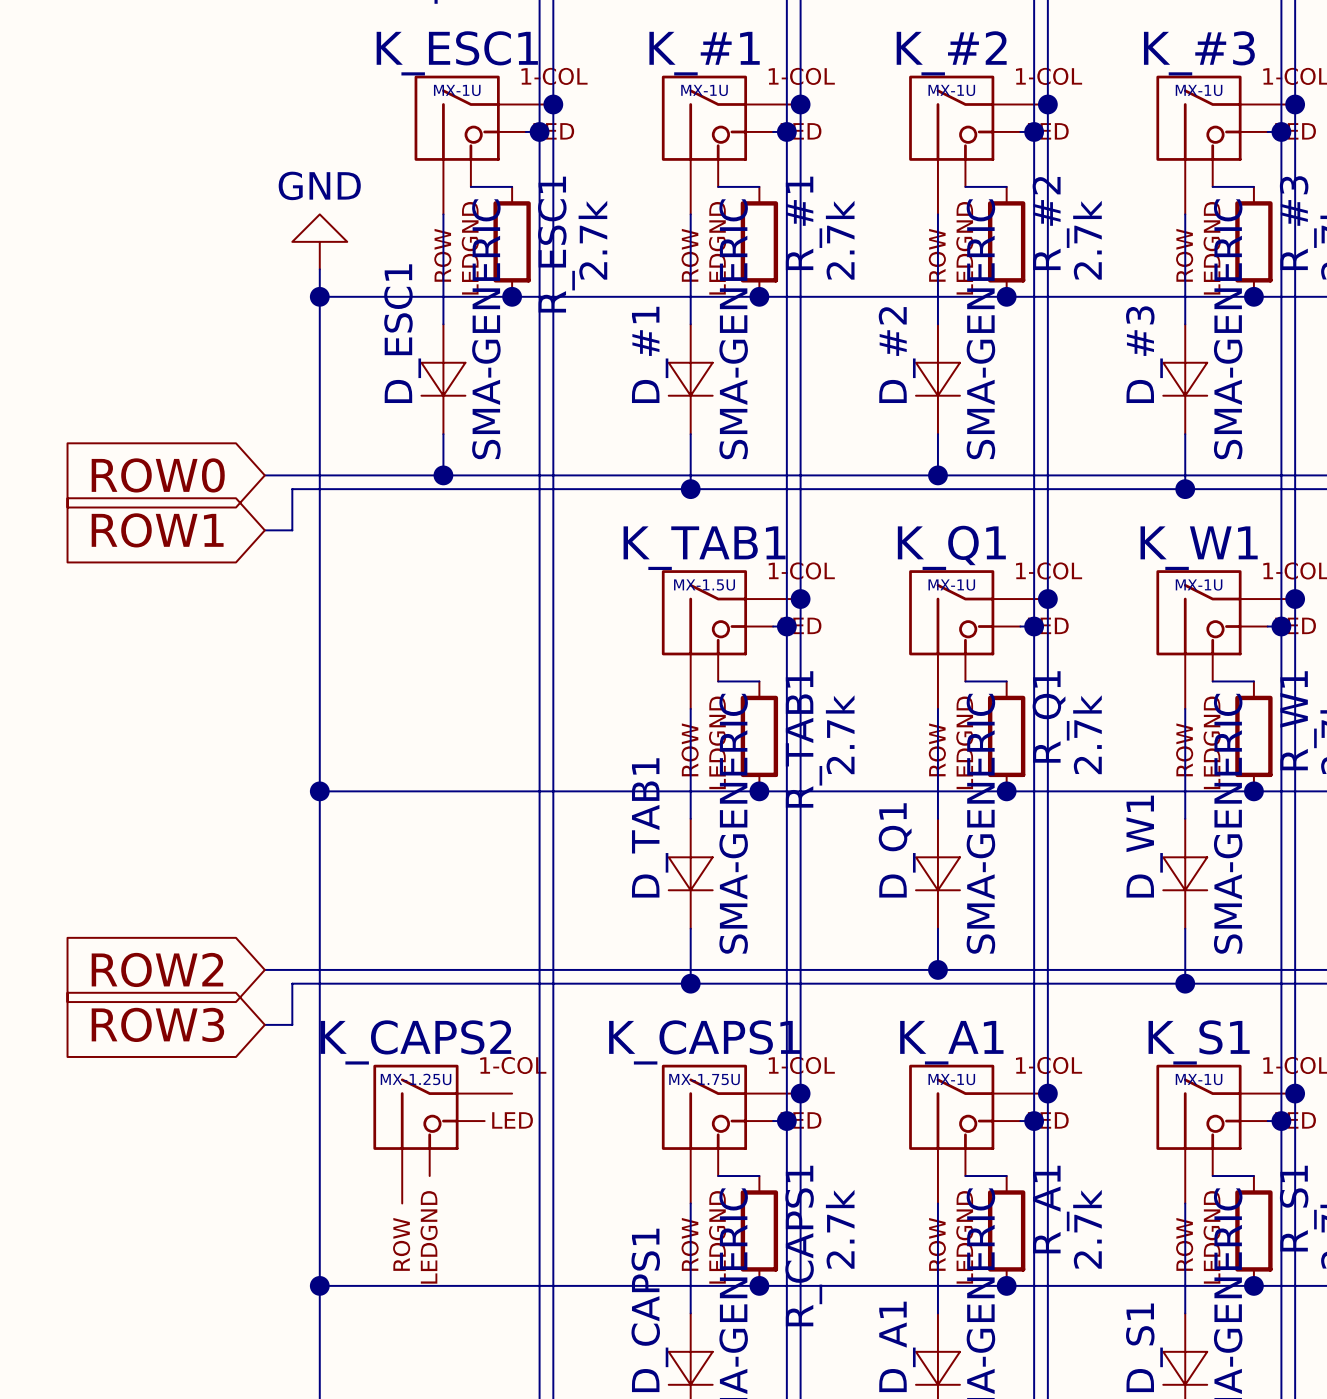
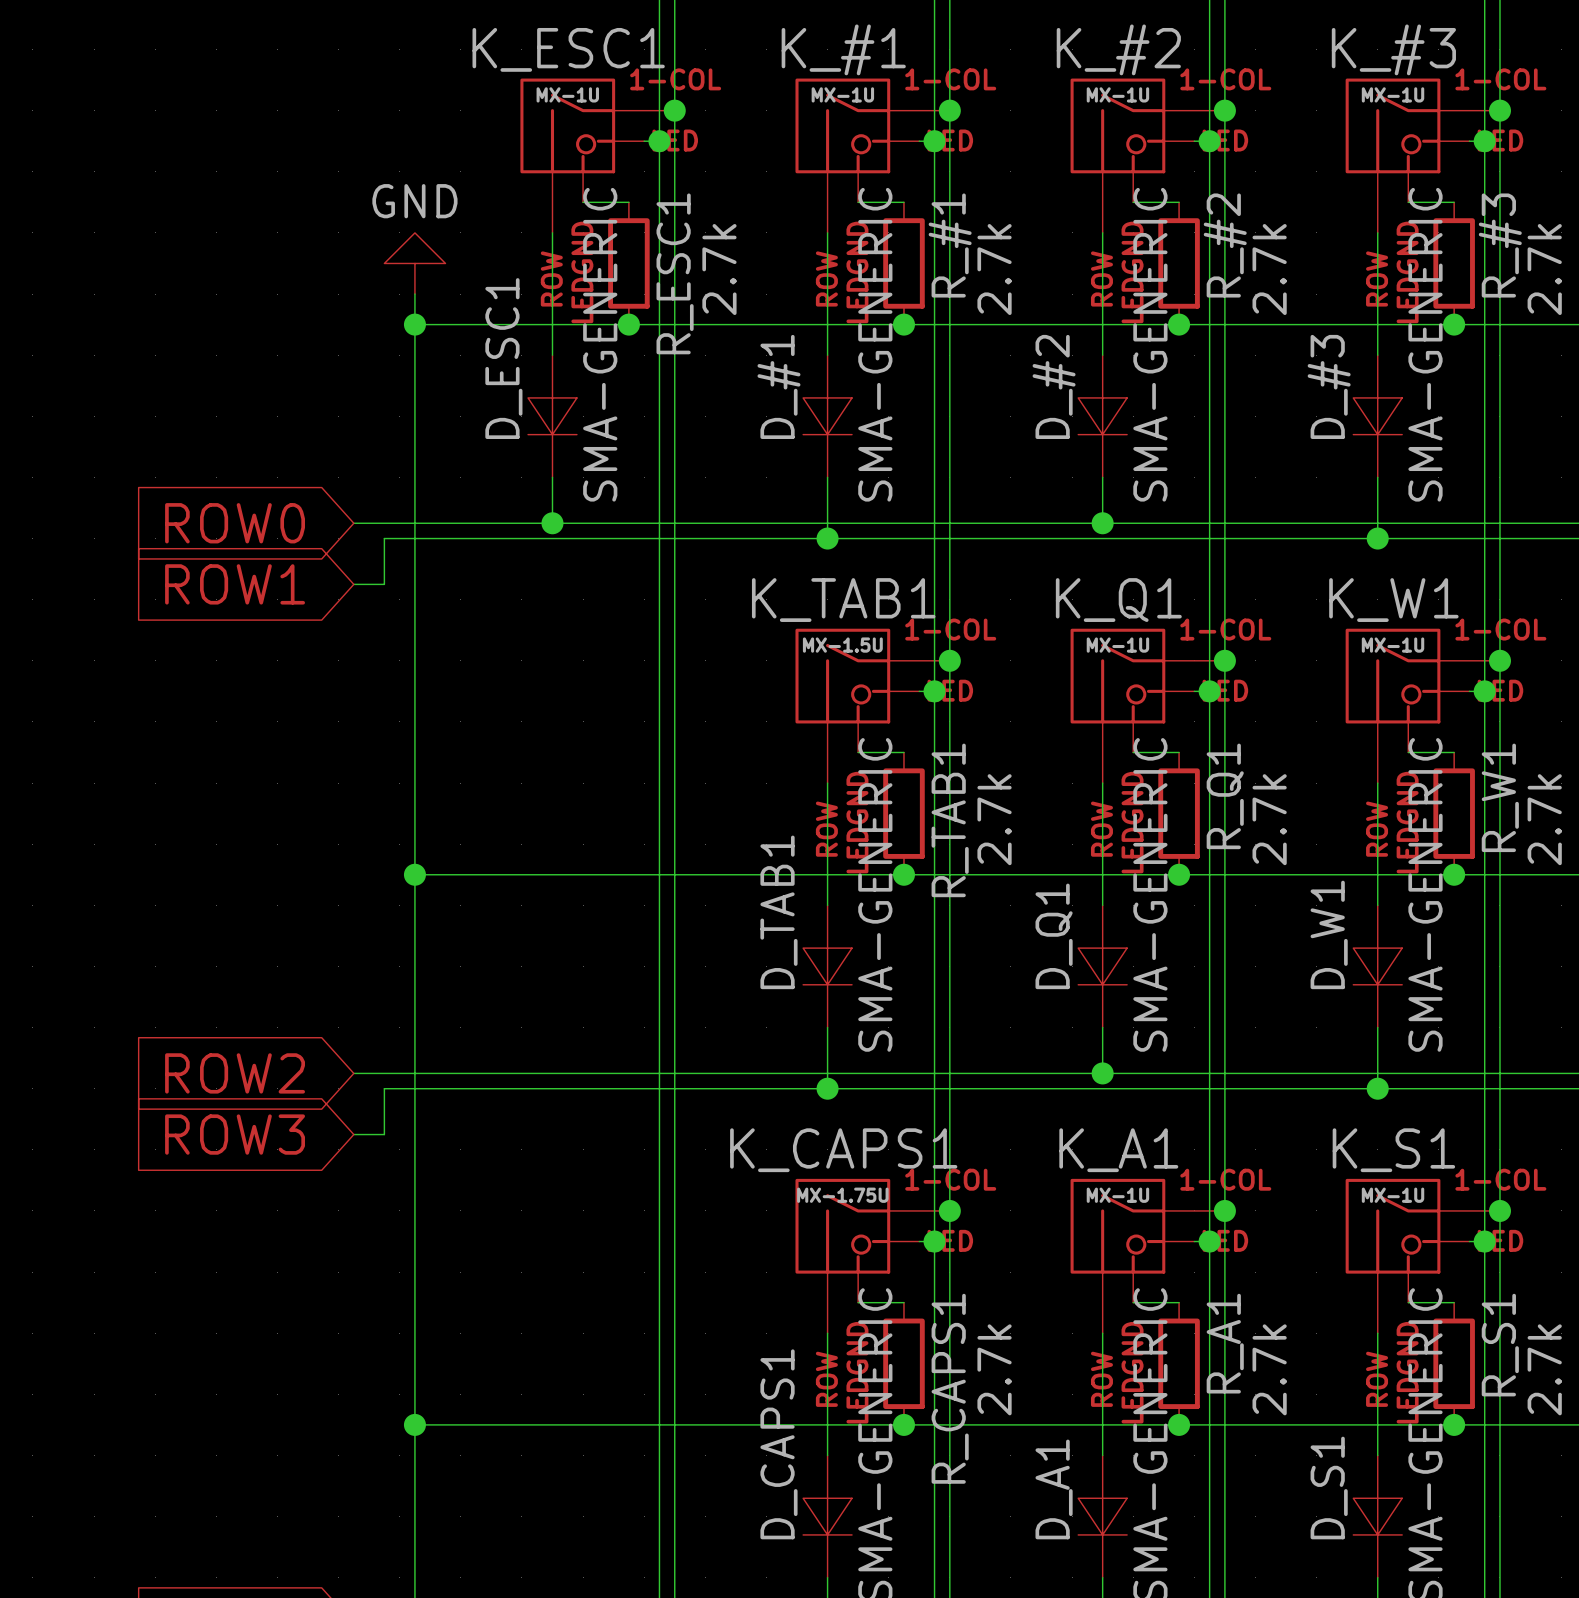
K_CAPS2: MX-1.25U (442, 1134) -> none

